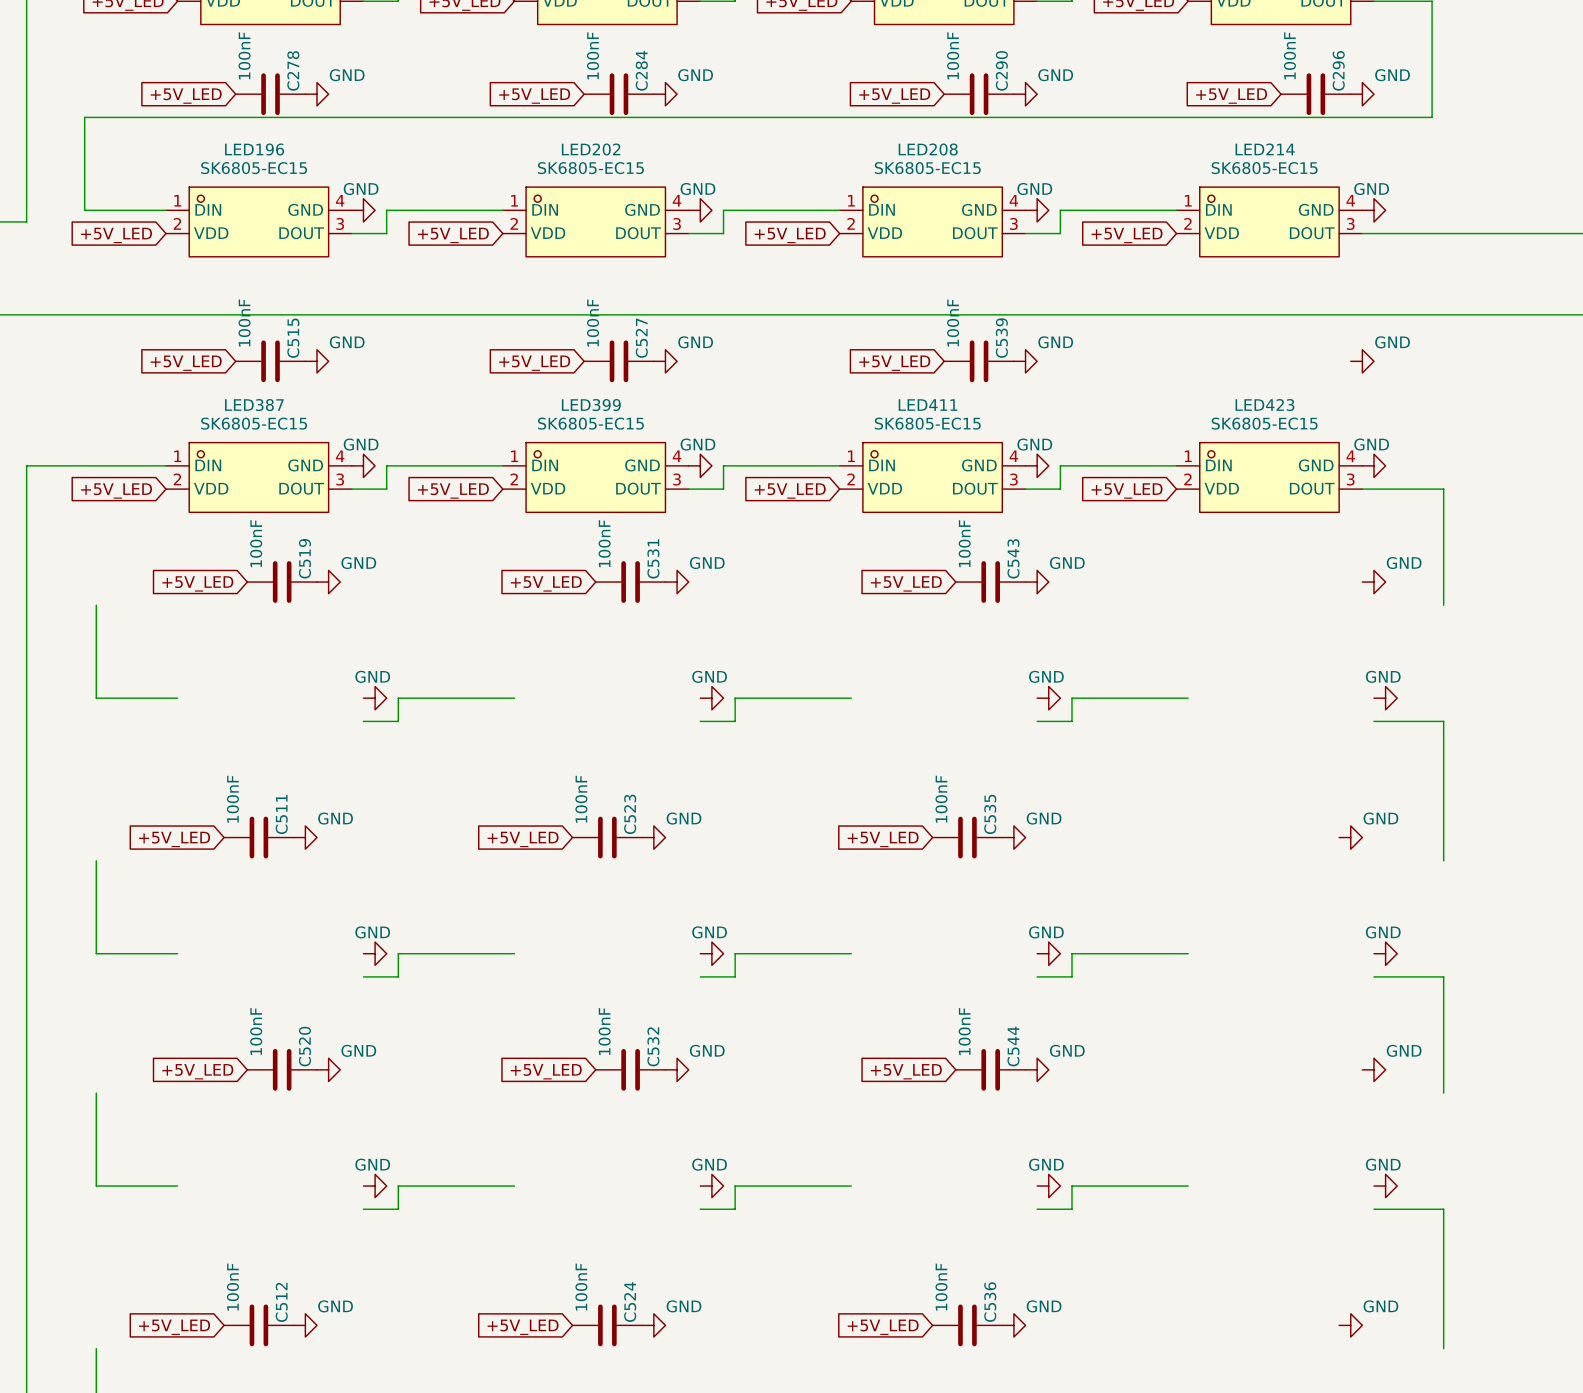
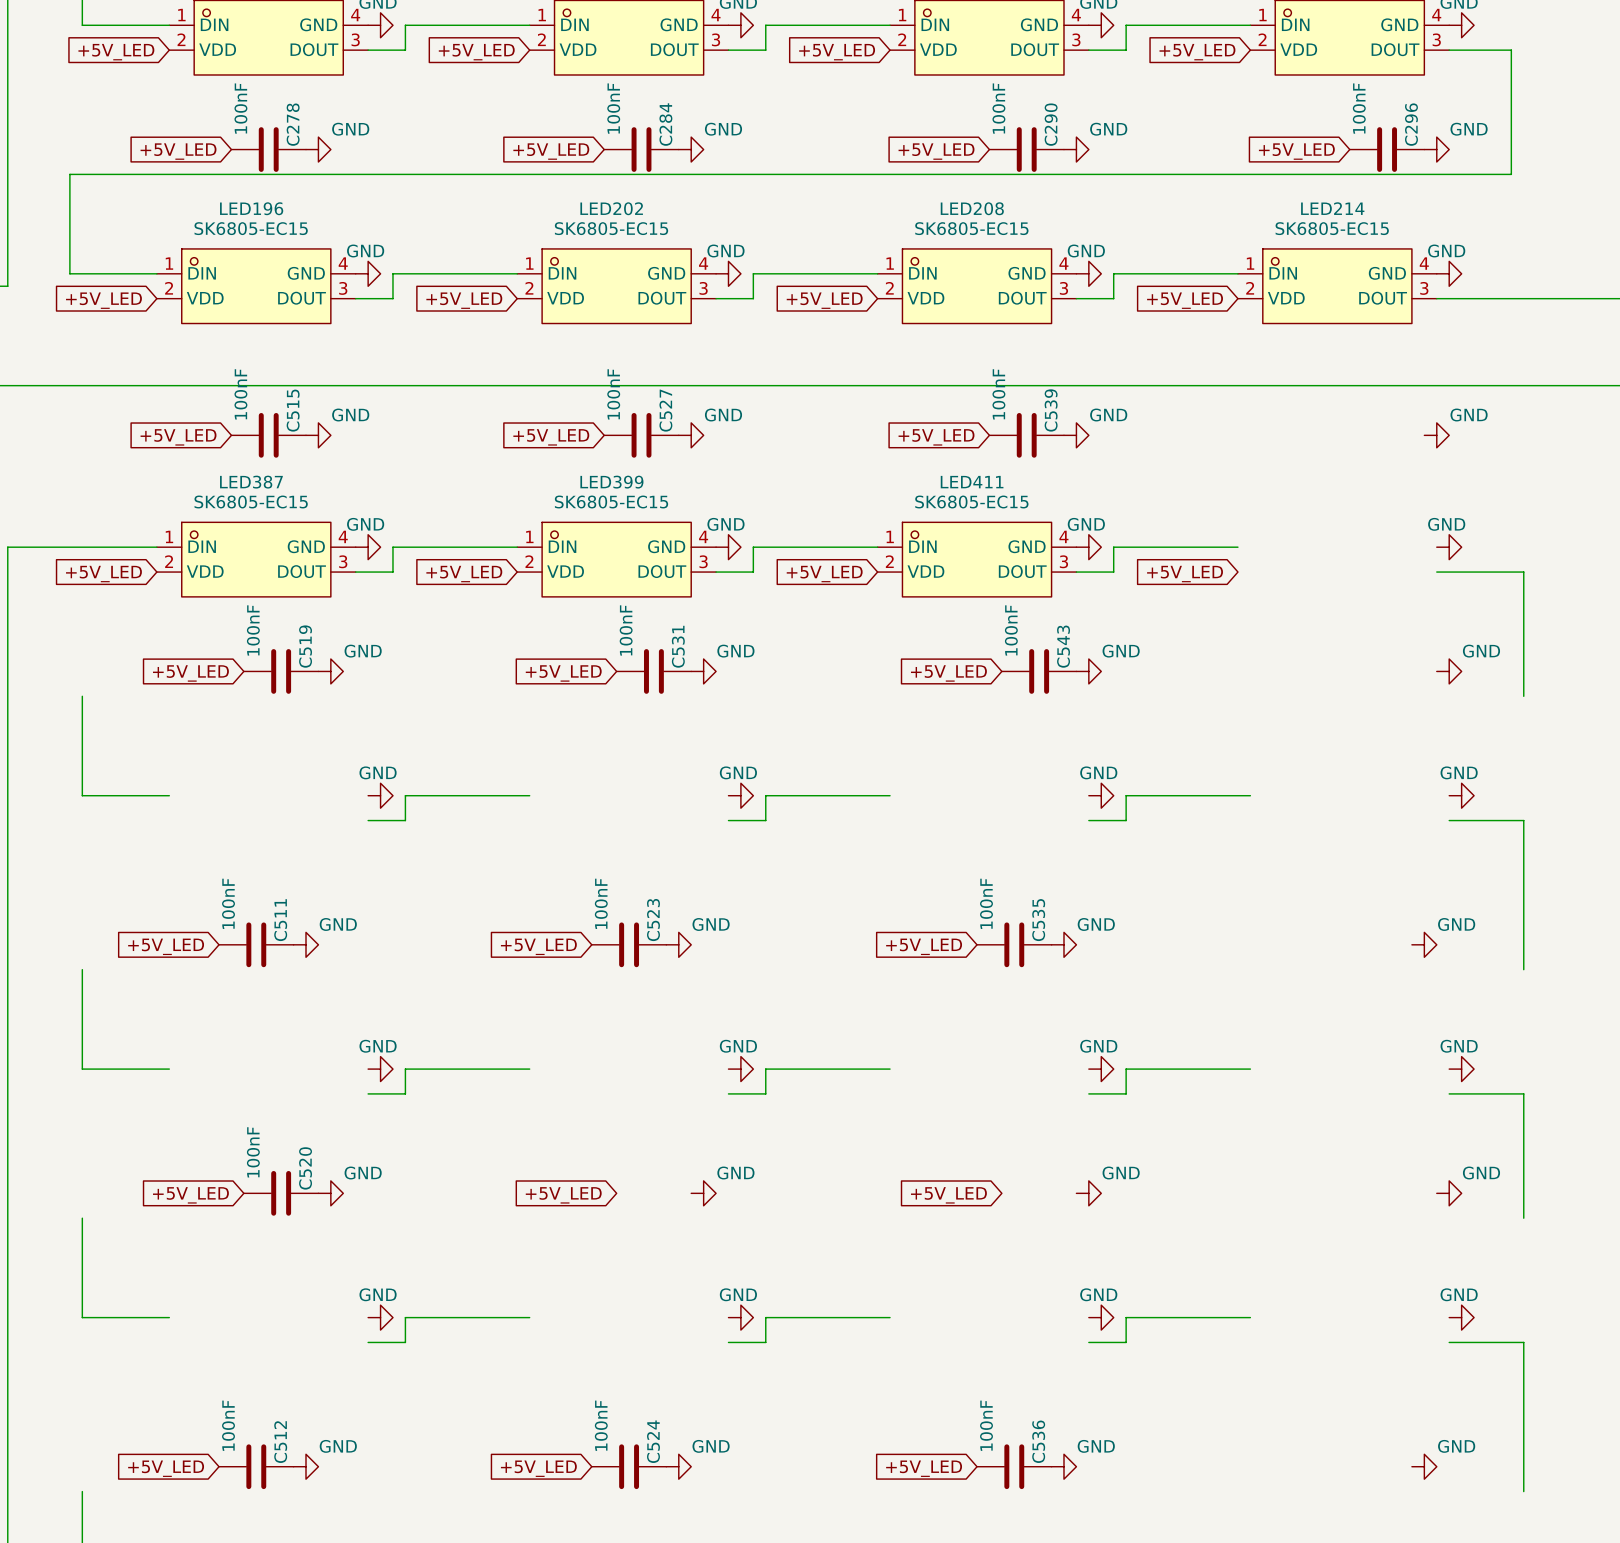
LED423: SK6805-EC15 (1269, 477) -> none
C532: 100nF (630, 1069) -> none
C544: 100nF (990, 1069) -> none

